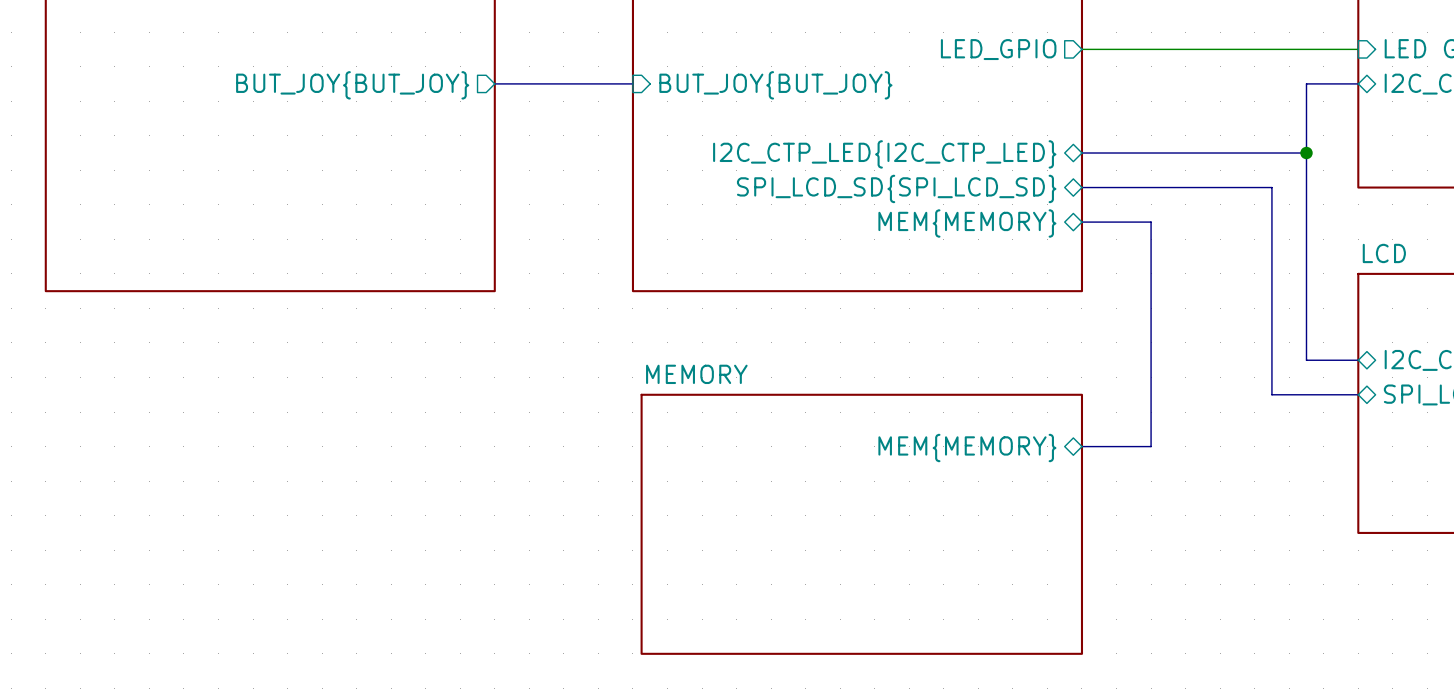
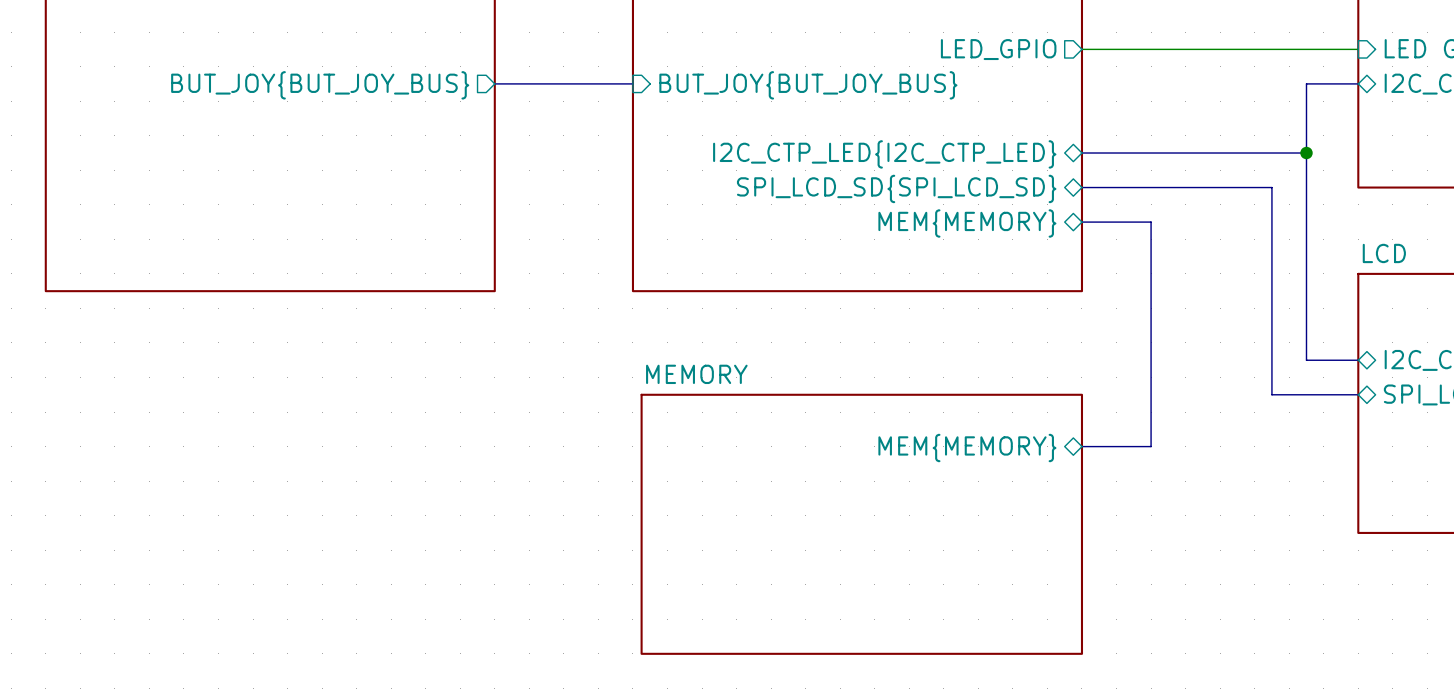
sheet pin: BUT_JOY{BUT_JOY} (352, 85) -> BUT_JOY{BUT_JOY_BUS} (320, 85)
sheet pin: BUT_JOY{BUT_JOY} (775, 85) -> BUT_JOY{BUT_JOY_BUS} (808, 85)

